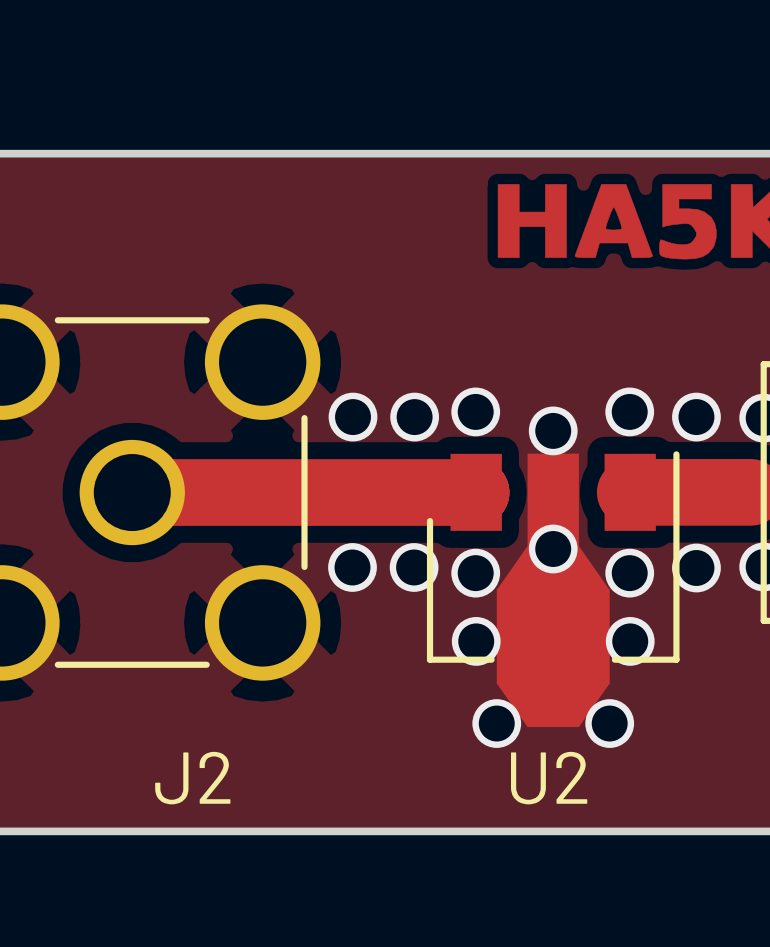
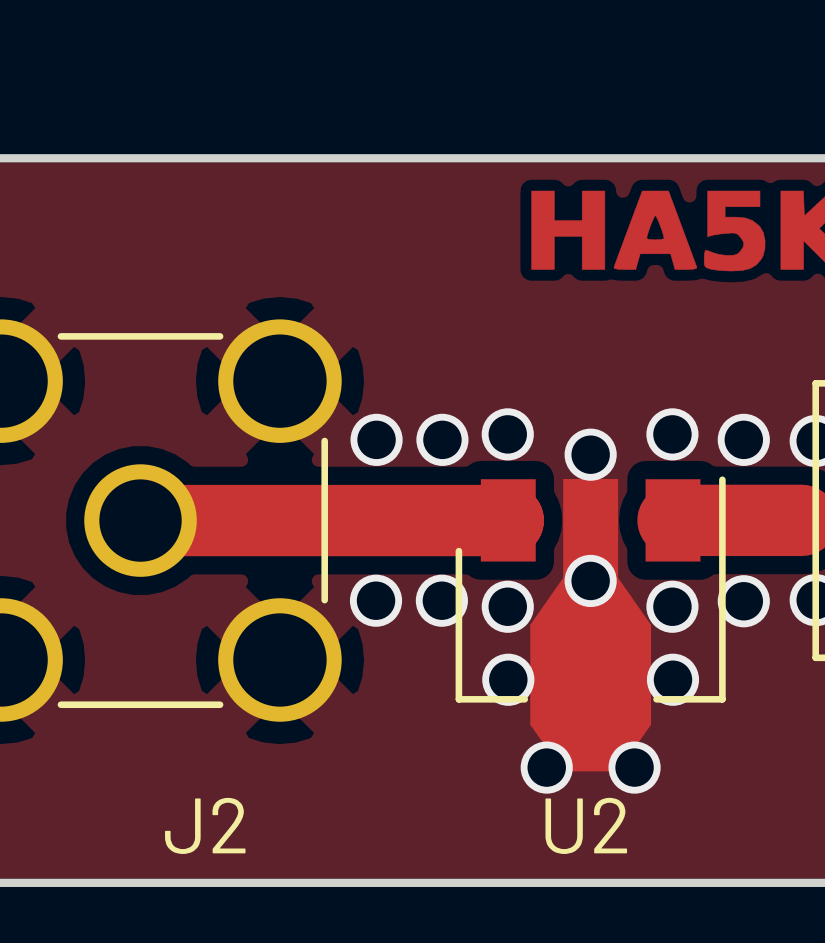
via position: (496, 723) -> (546, 767)
via position: (609, 723) -> (634, 767)

